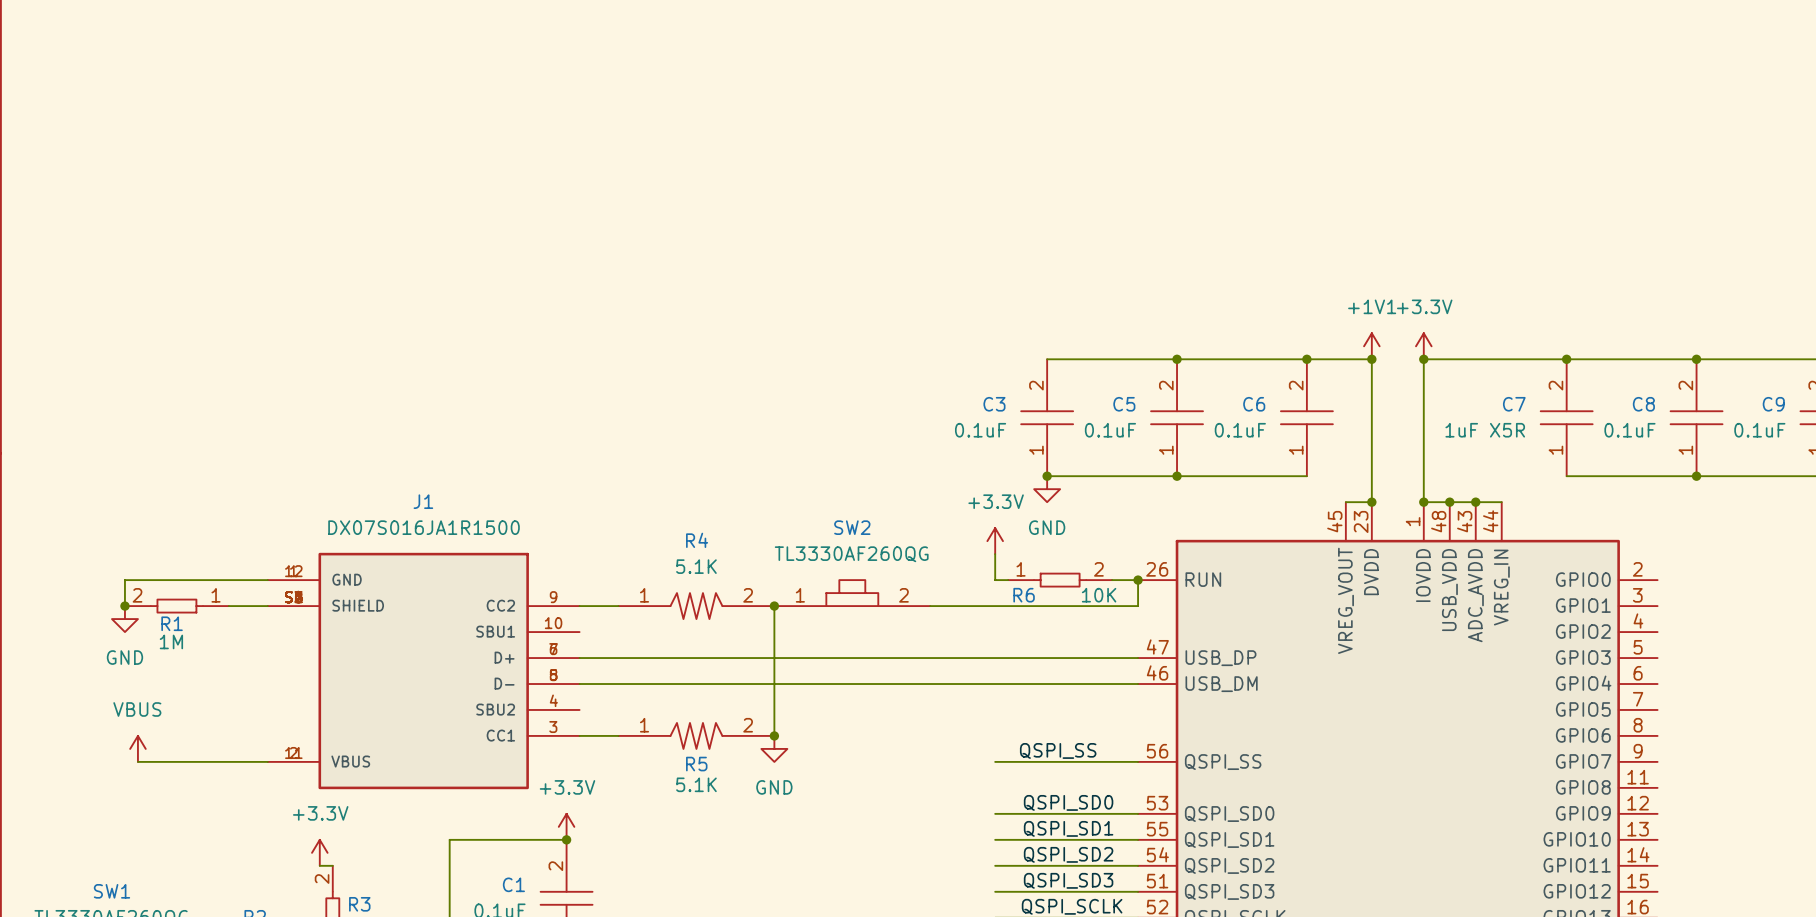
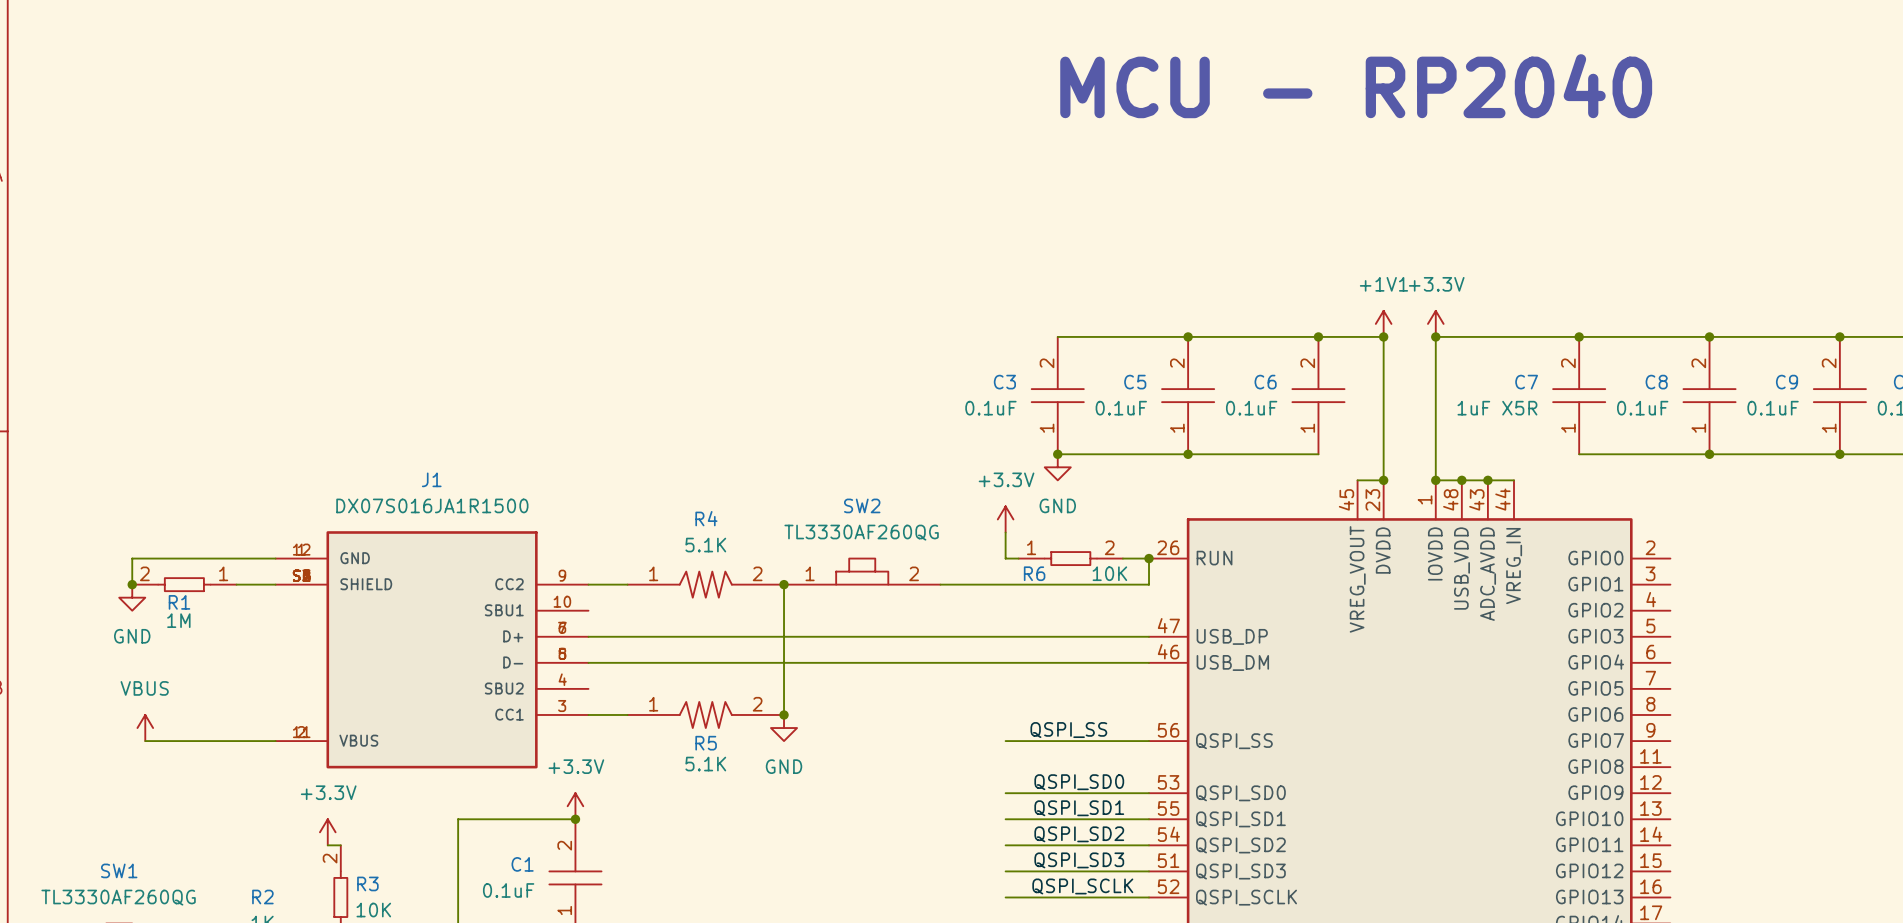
text: none -> MCU - RP2040 (1356, 86)

